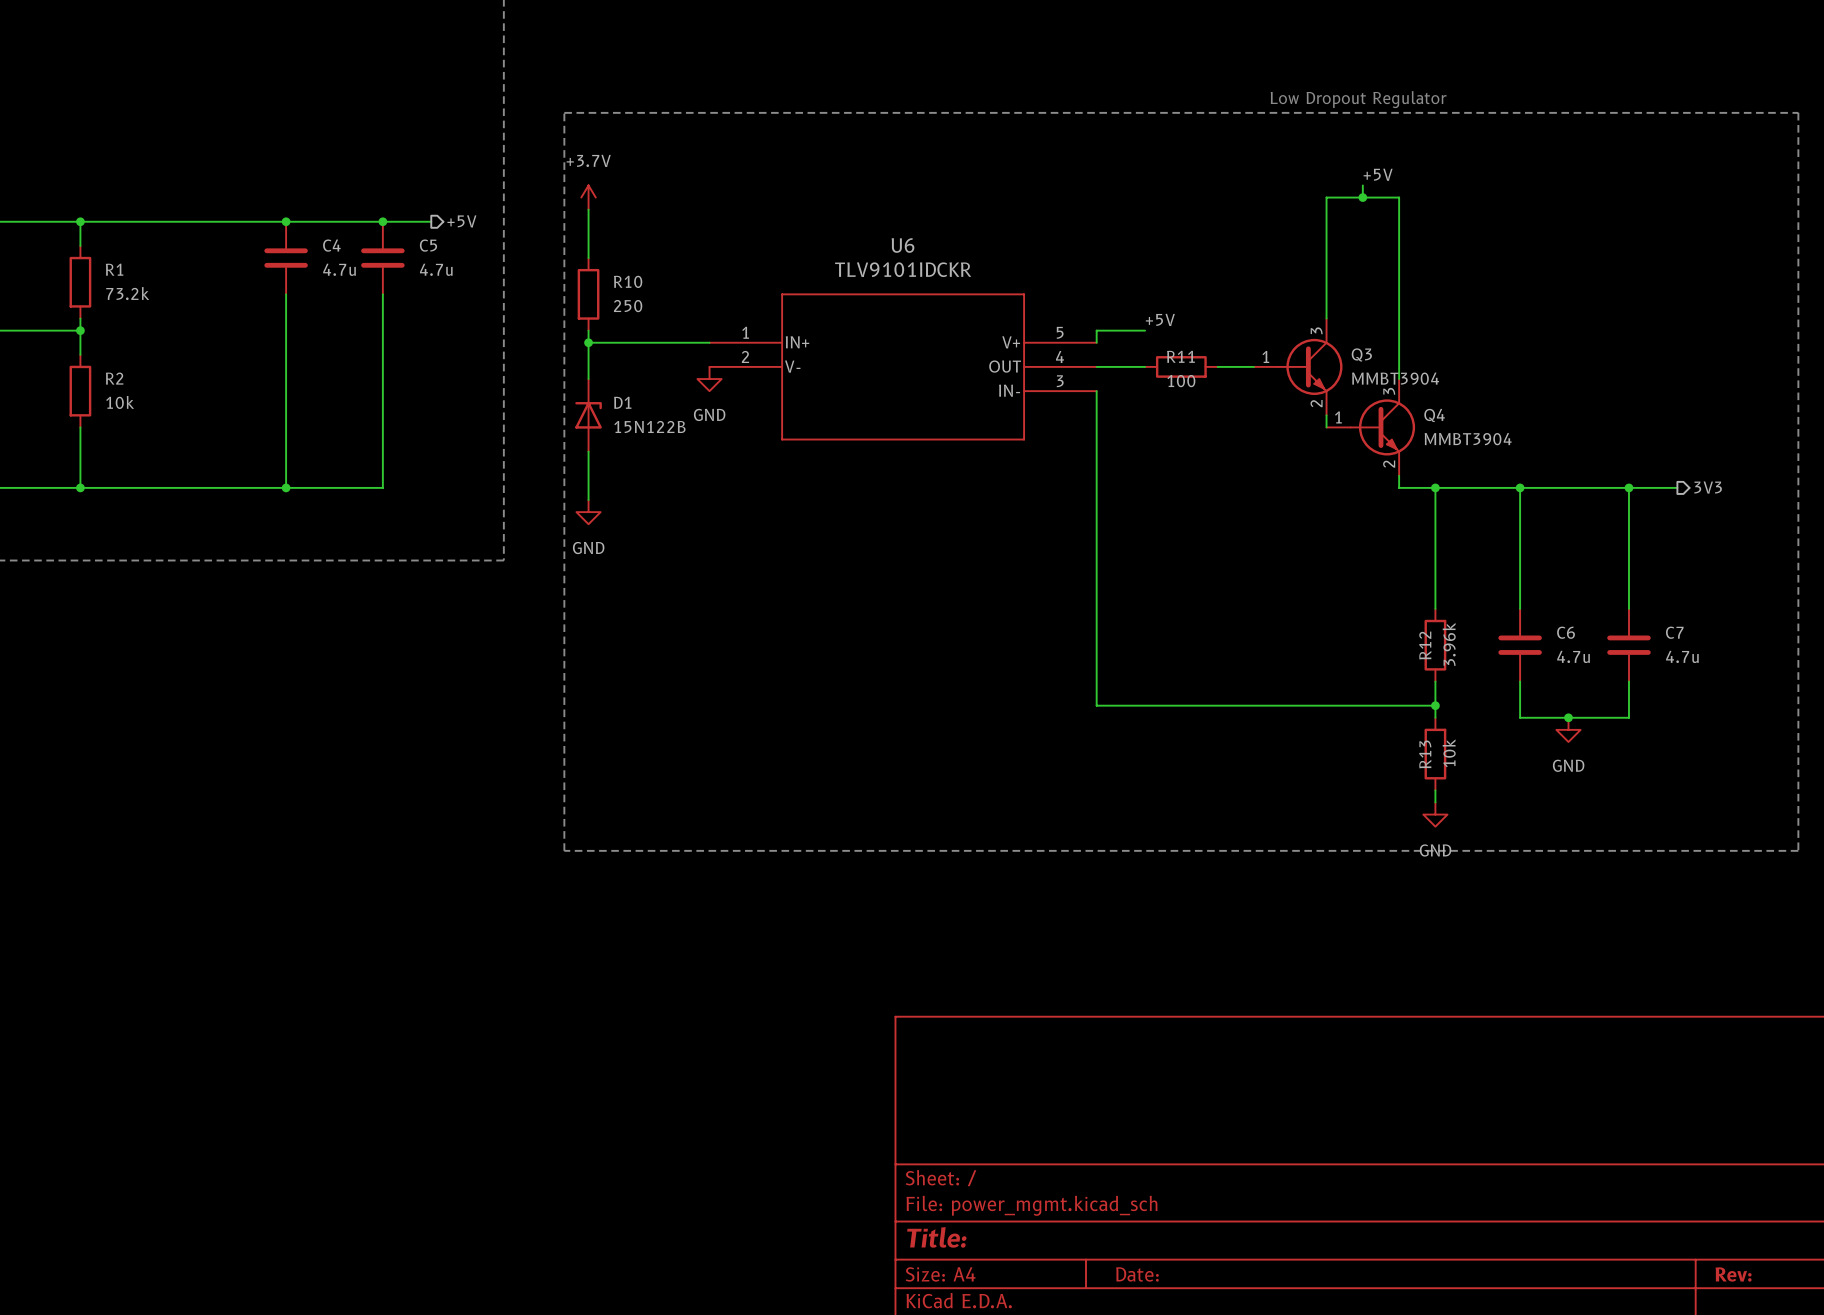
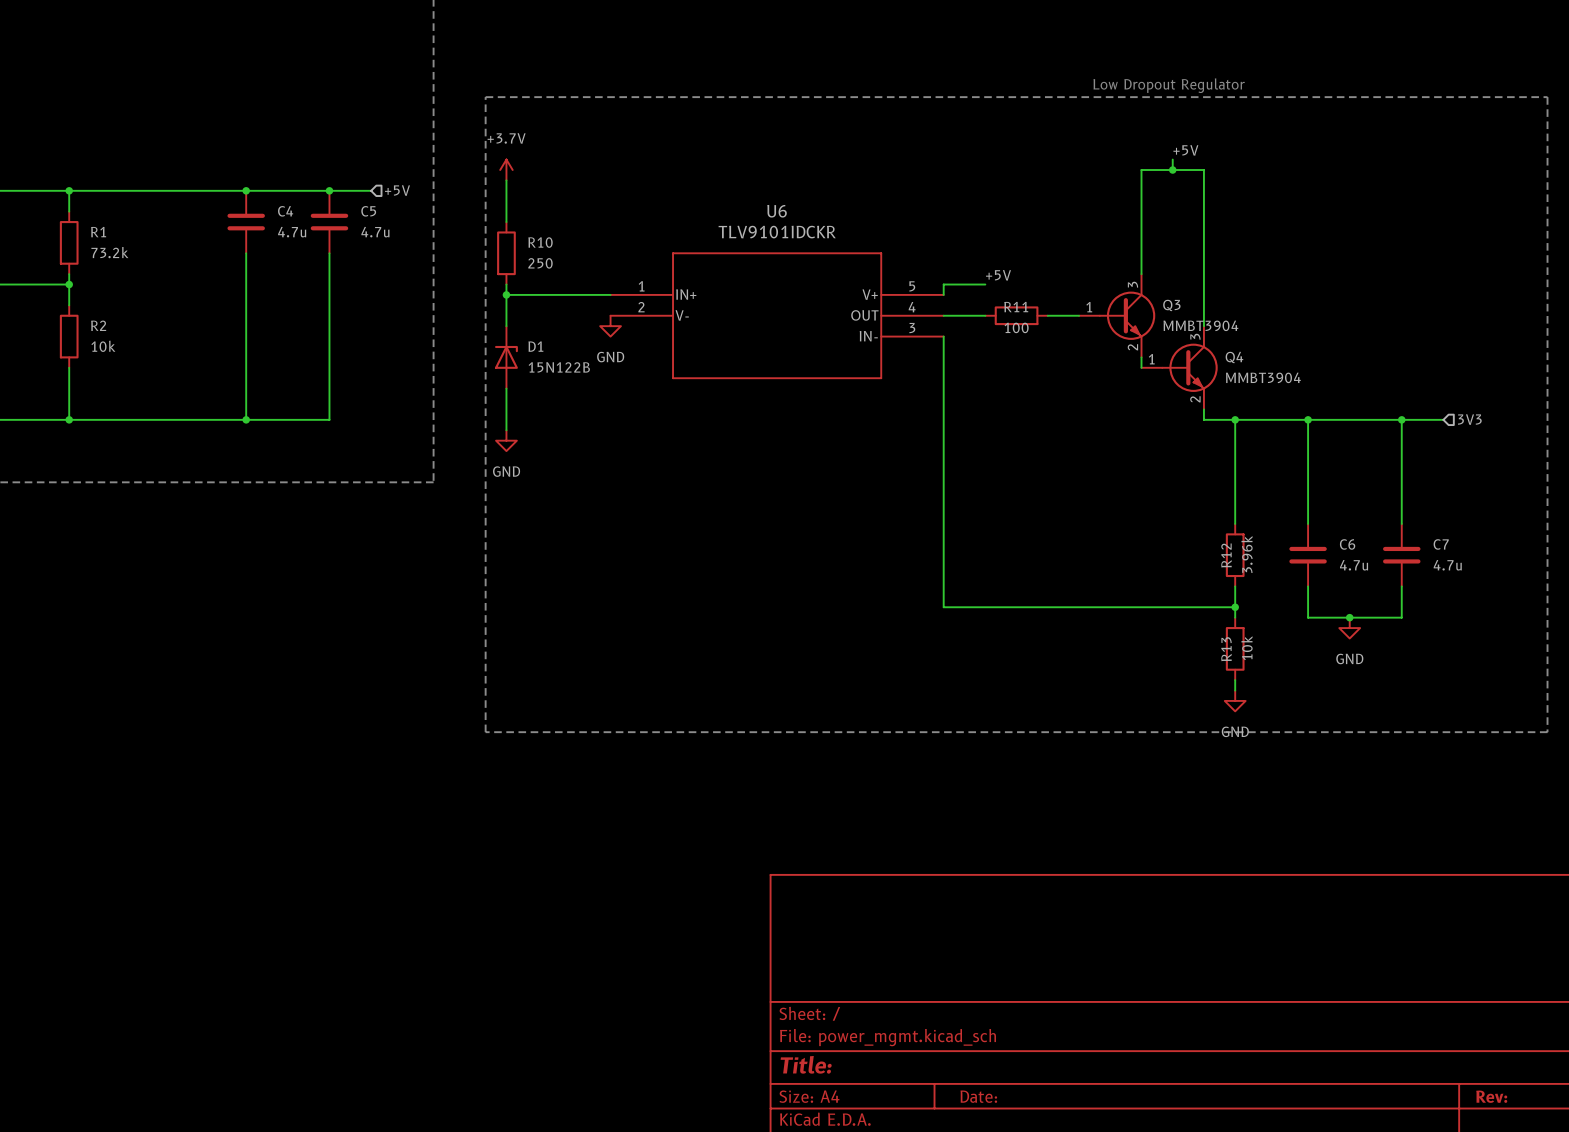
hierarchical label shape: output (461, 221) -> input (397, 190)
hierarchical label shape: output (1708, 487) -> input (1469, 419)

